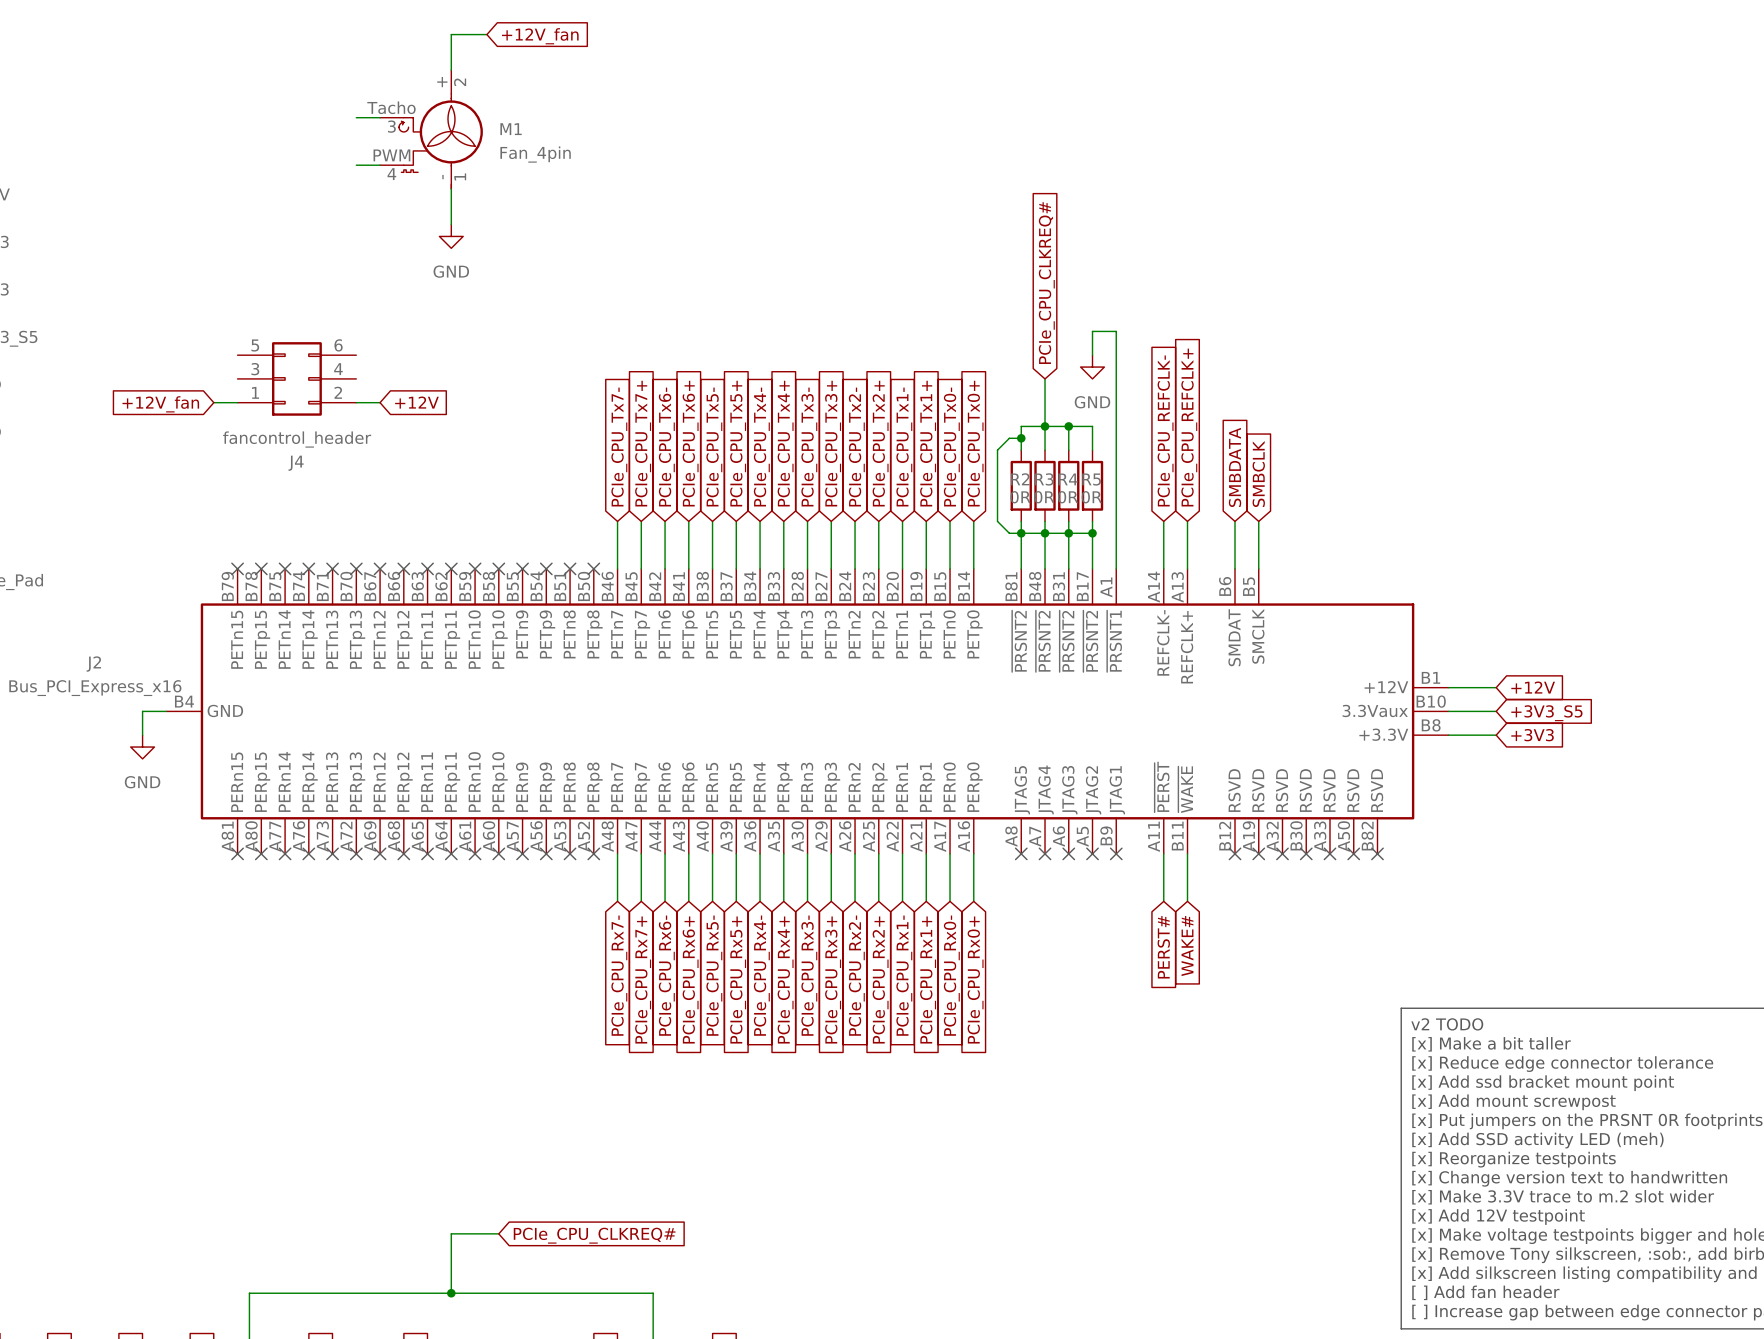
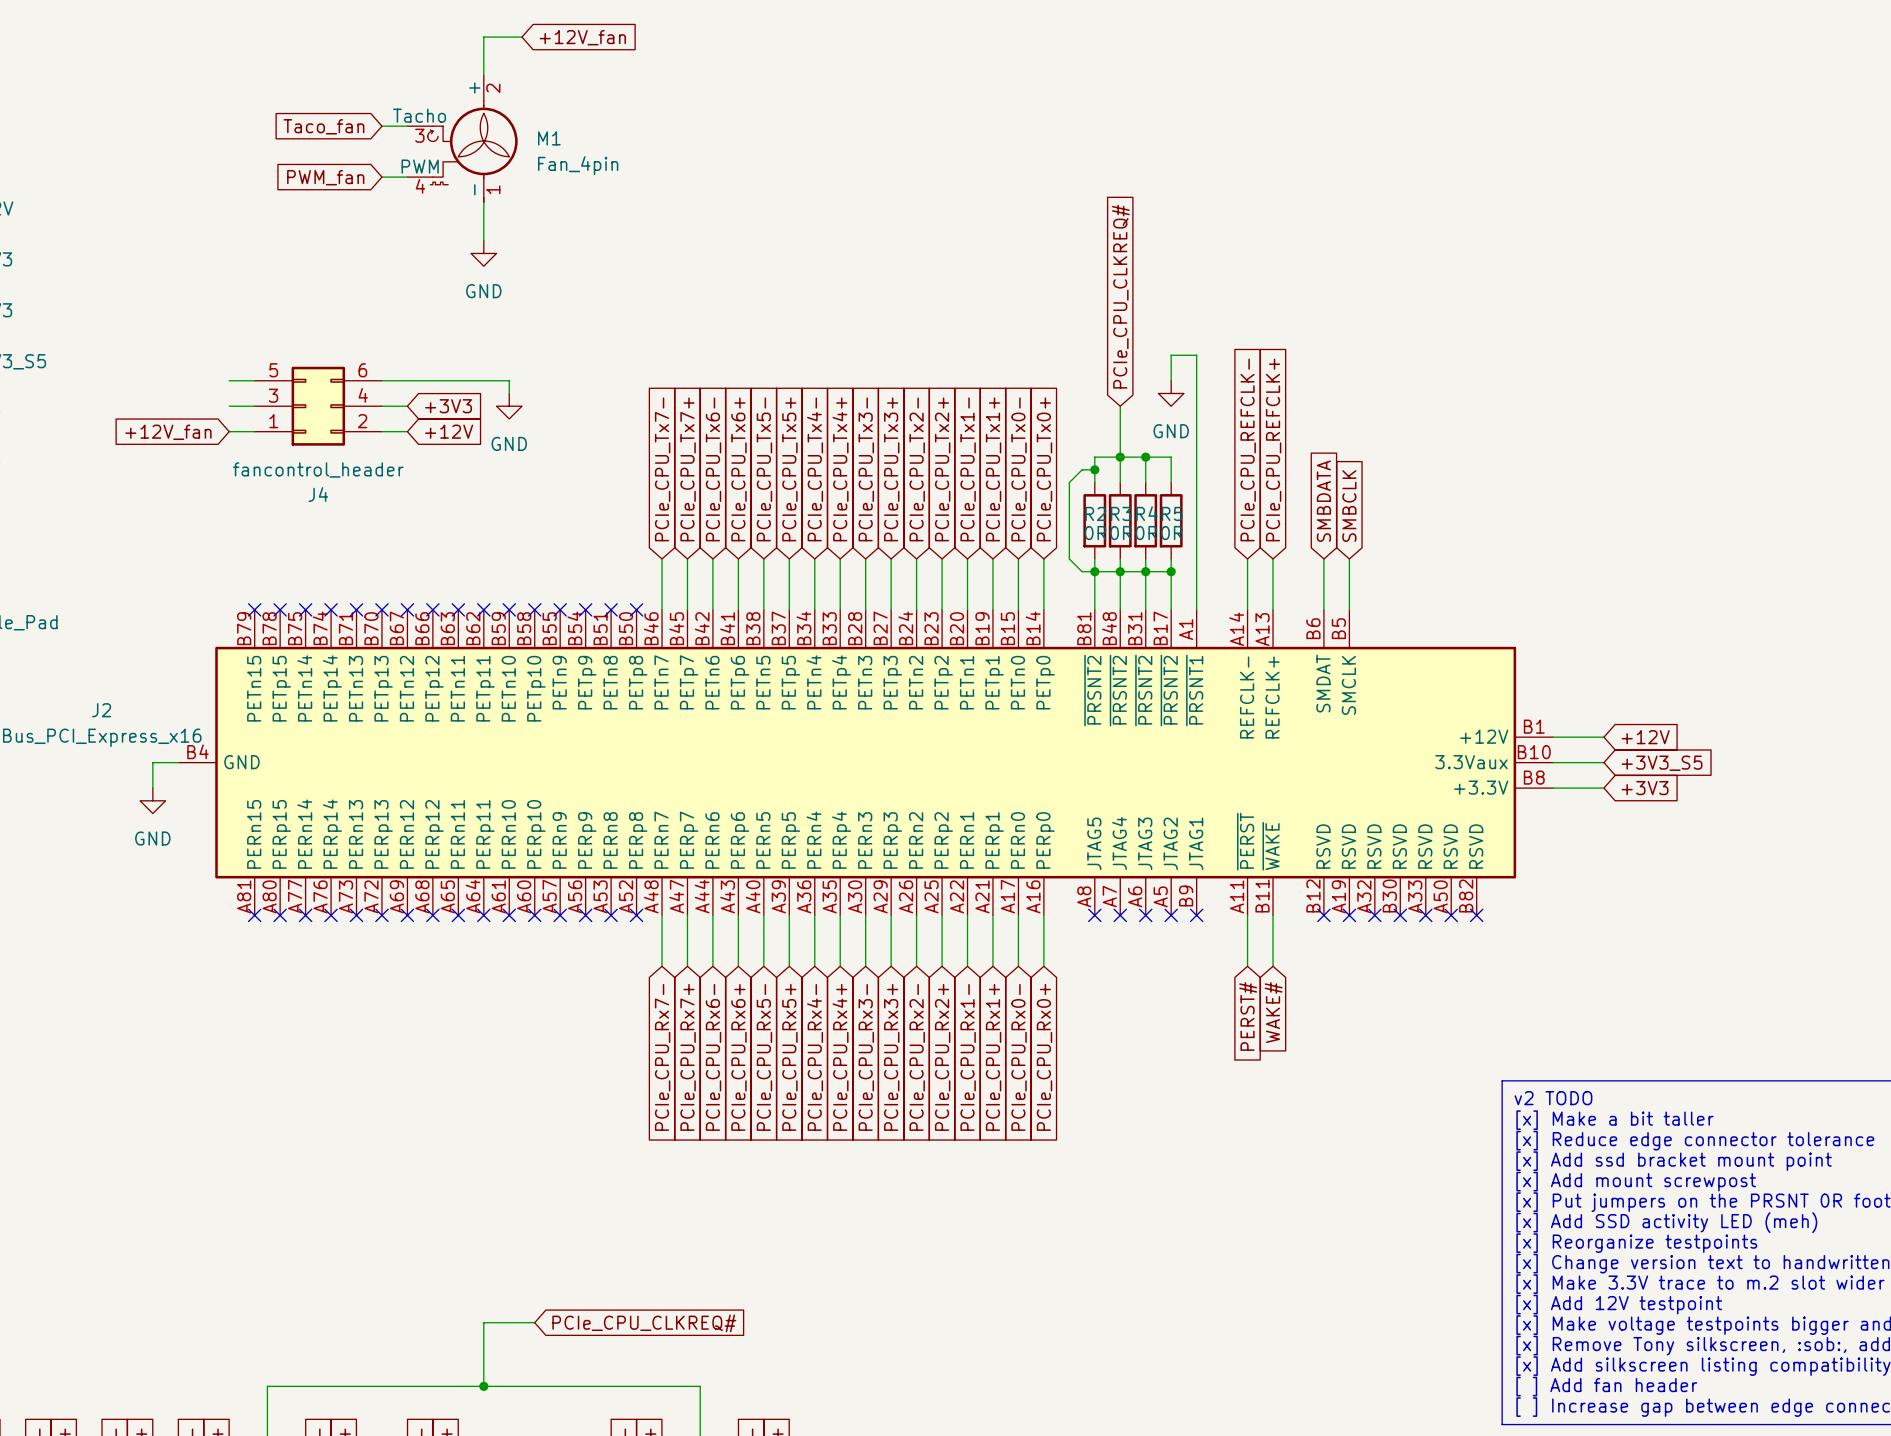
global label: none -> Taco_fan (323, 126)
global label: none -> PWM_fan (325, 177)
wire: none -> (229, 380) (254, 380)
wire: none -> (381, 380) (509, 380) (509, 393)
wire: none -> (229, 406) (254, 406)
wire: none -> (381, 406) (407, 406)
global label: none -> +3V3 (448, 406)
power symbol: none -> GND (509, 406)

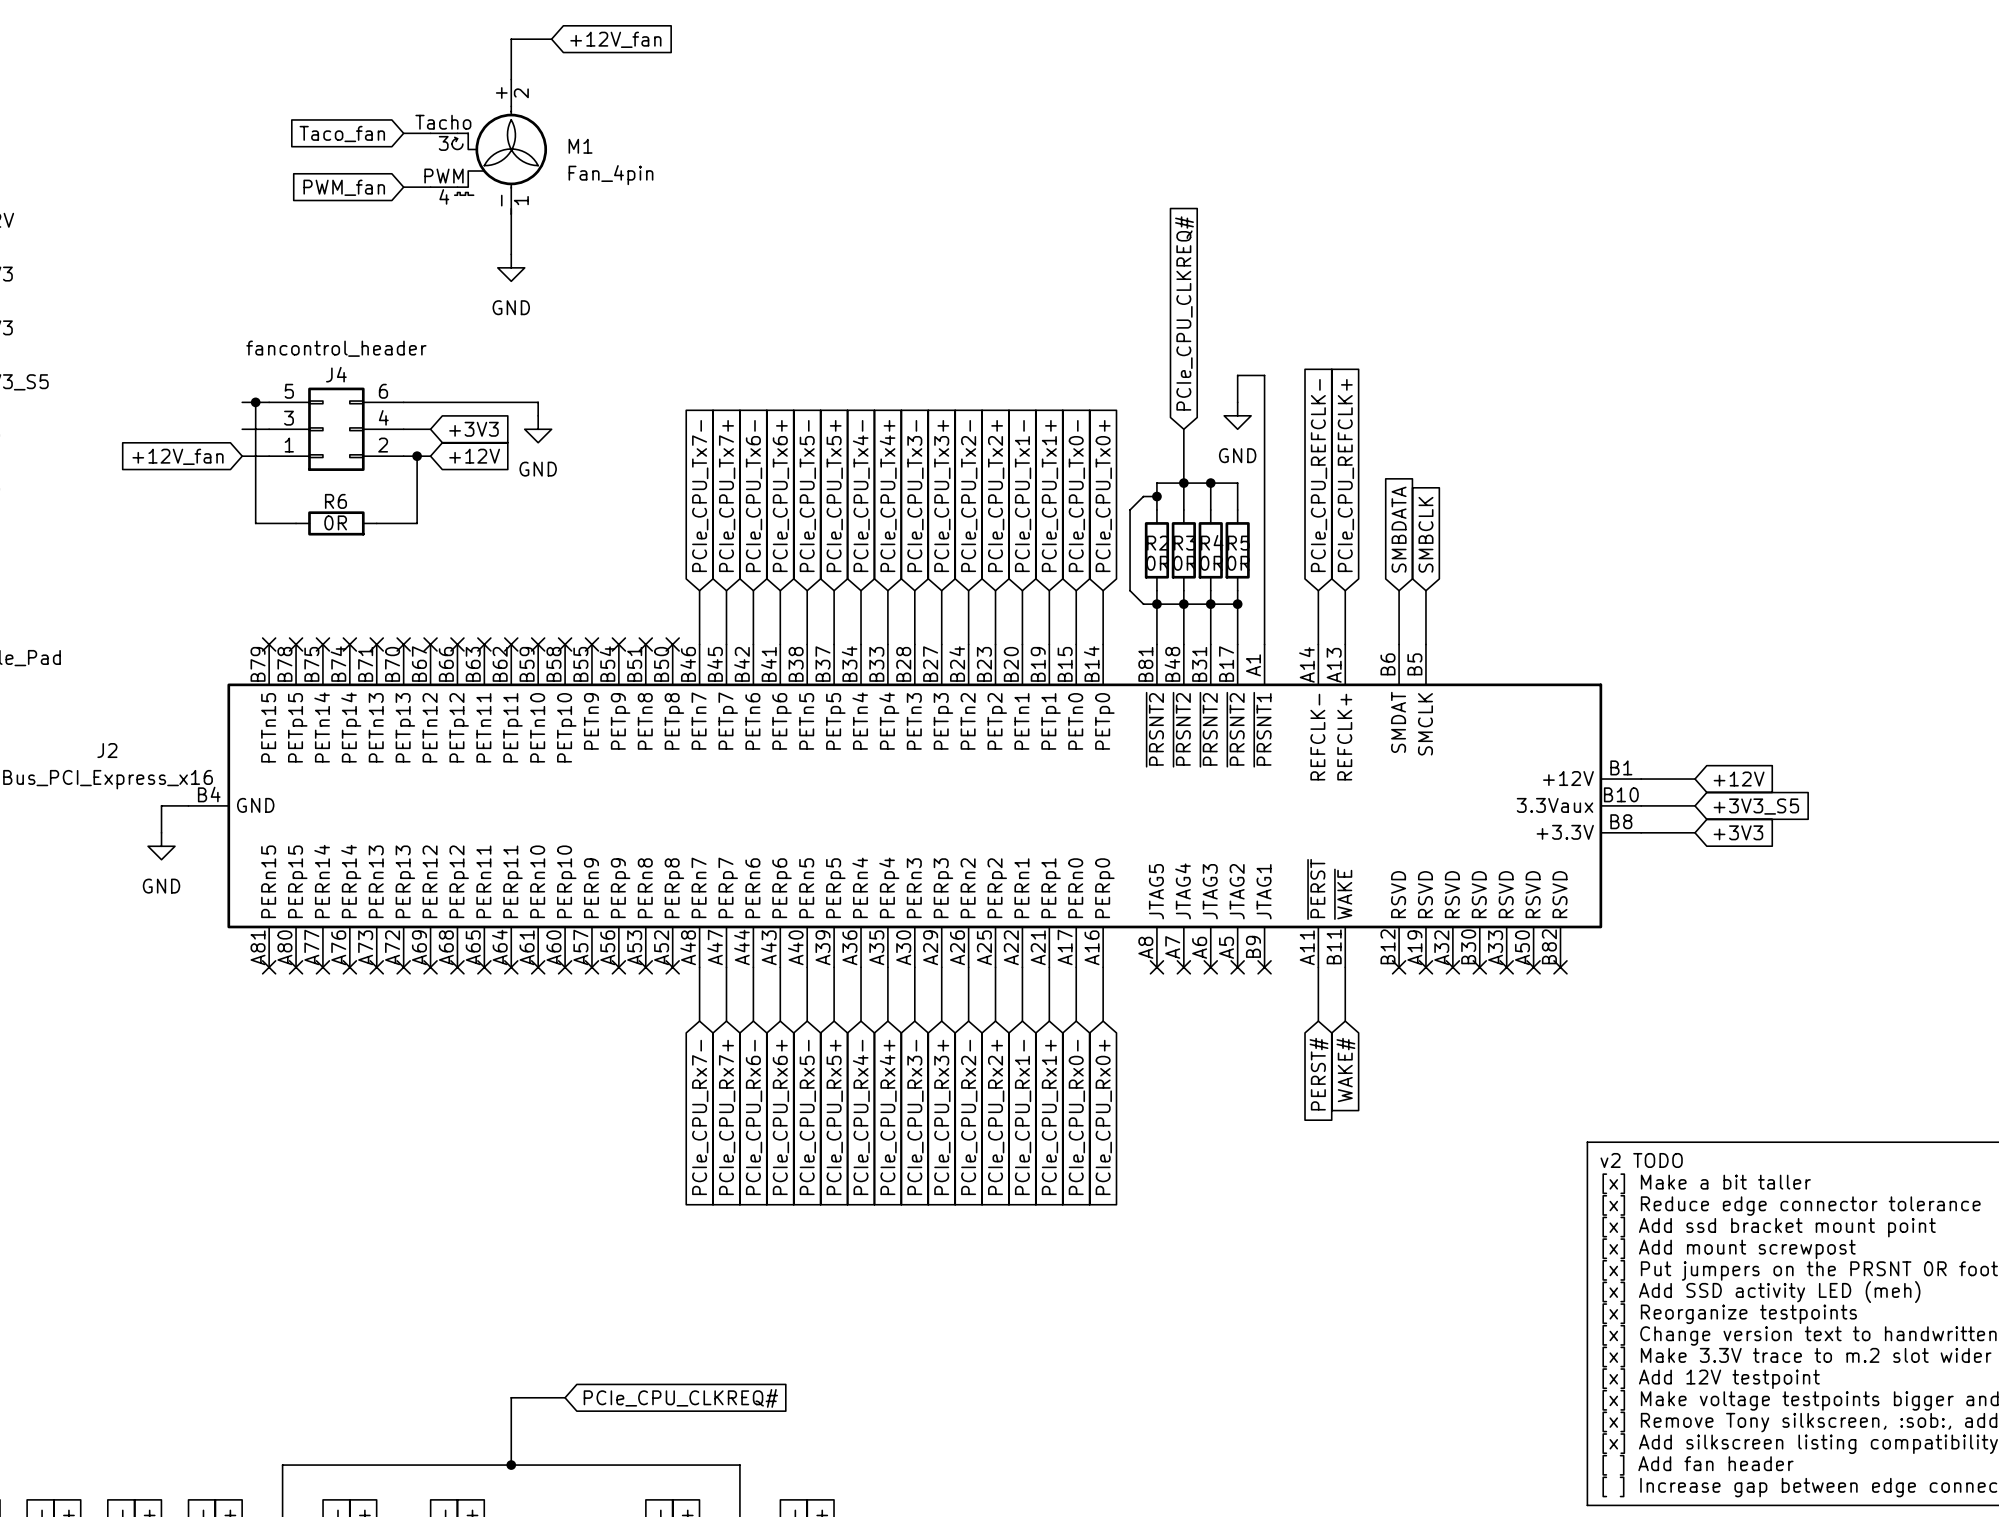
wire: none -> (255, 402) (255, 523) (296, 523)
junction: none -> (255, 402)
wire: none -> (417, 456) (417, 523) (376, 523)
junction: none -> (417, 456)
J4 value position: fancontrol_header (318, 469) -> fancontrol_header (336, 348)
J4 name position: J4 (318, 494) -> J4 (336, 374)
R6: none -> 0R (336, 523)

